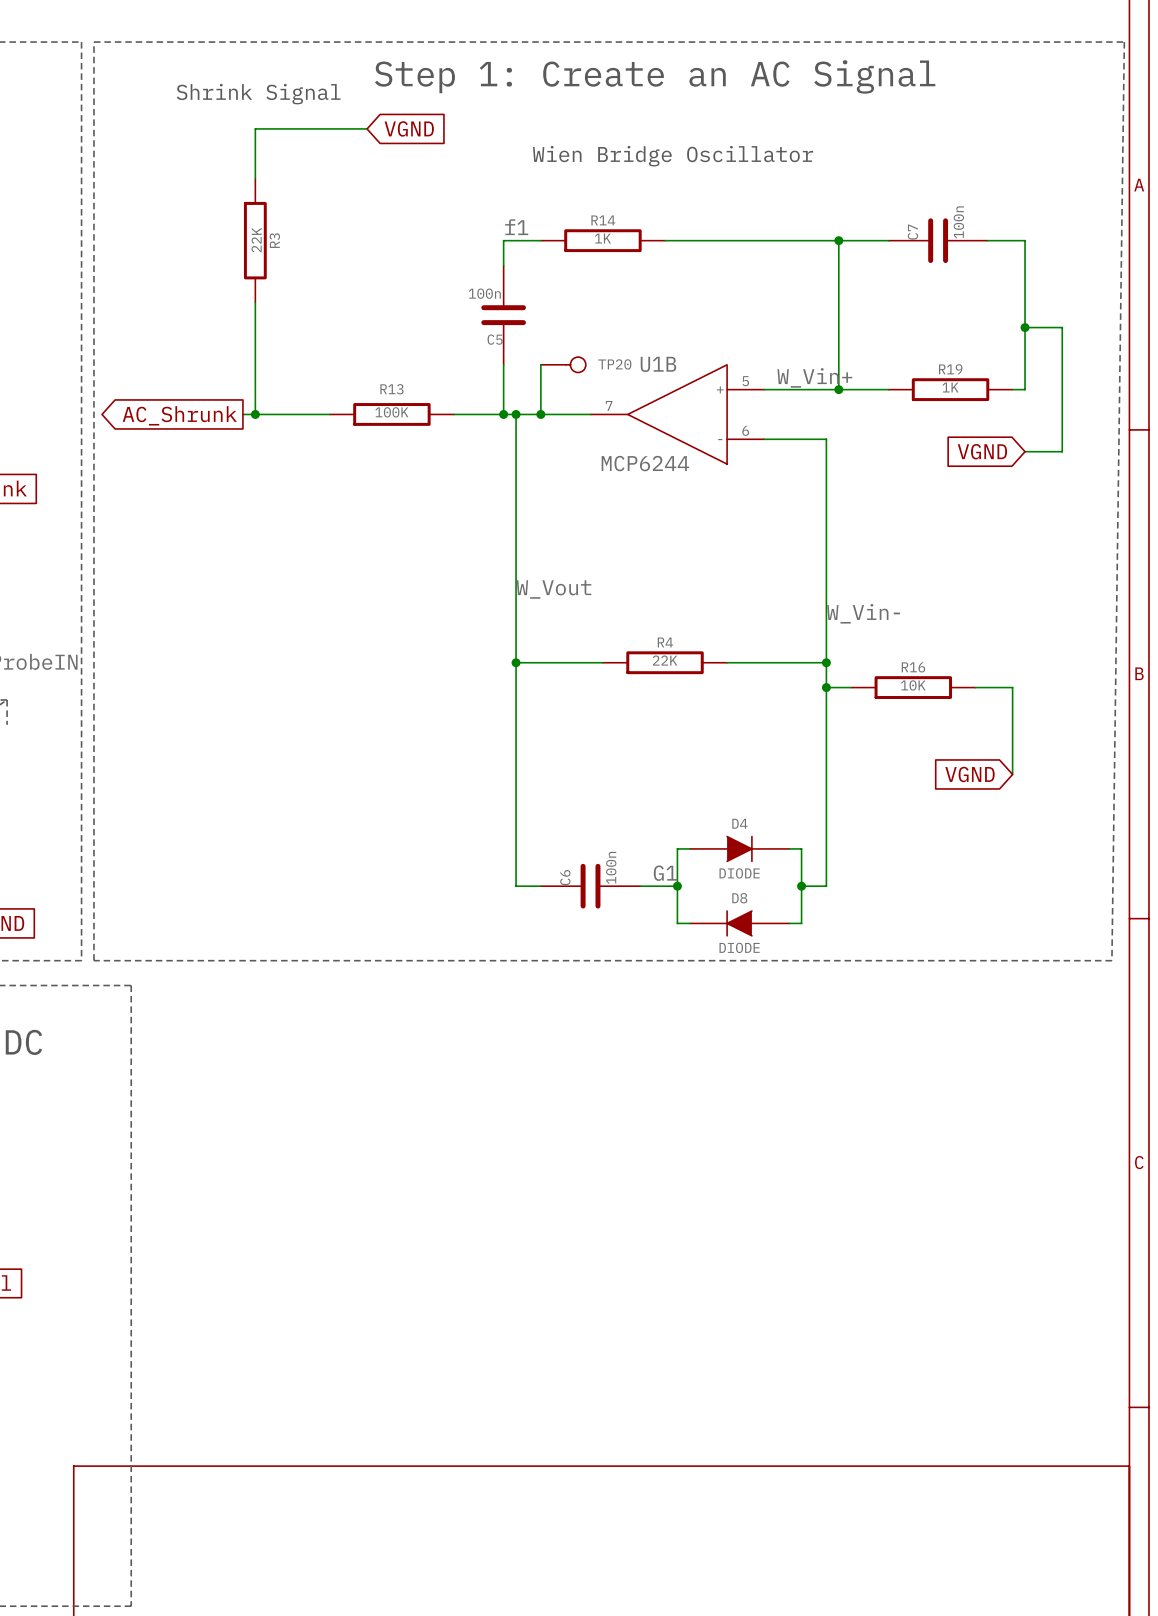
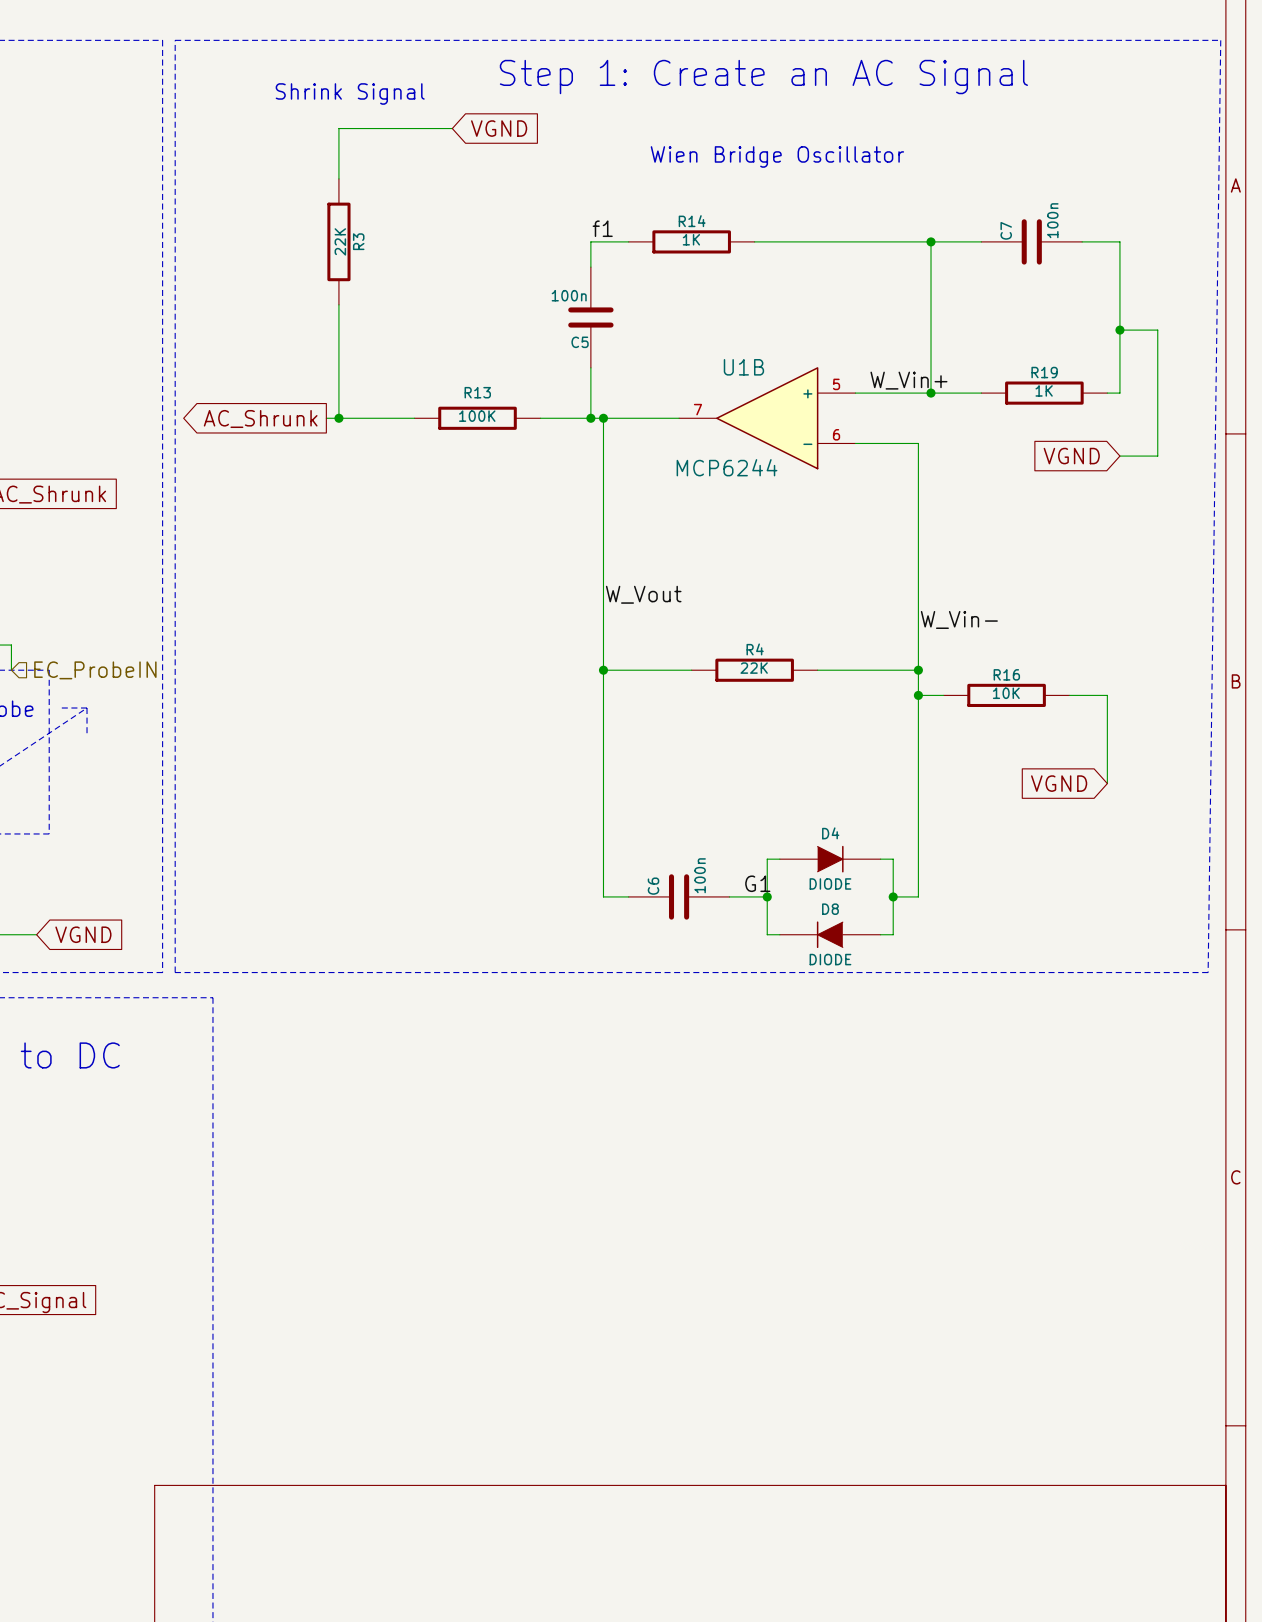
wire: (540, 364) (540, 414) -> none
TP20: (563, 364) -> none
junction: (540, 414) -> none

